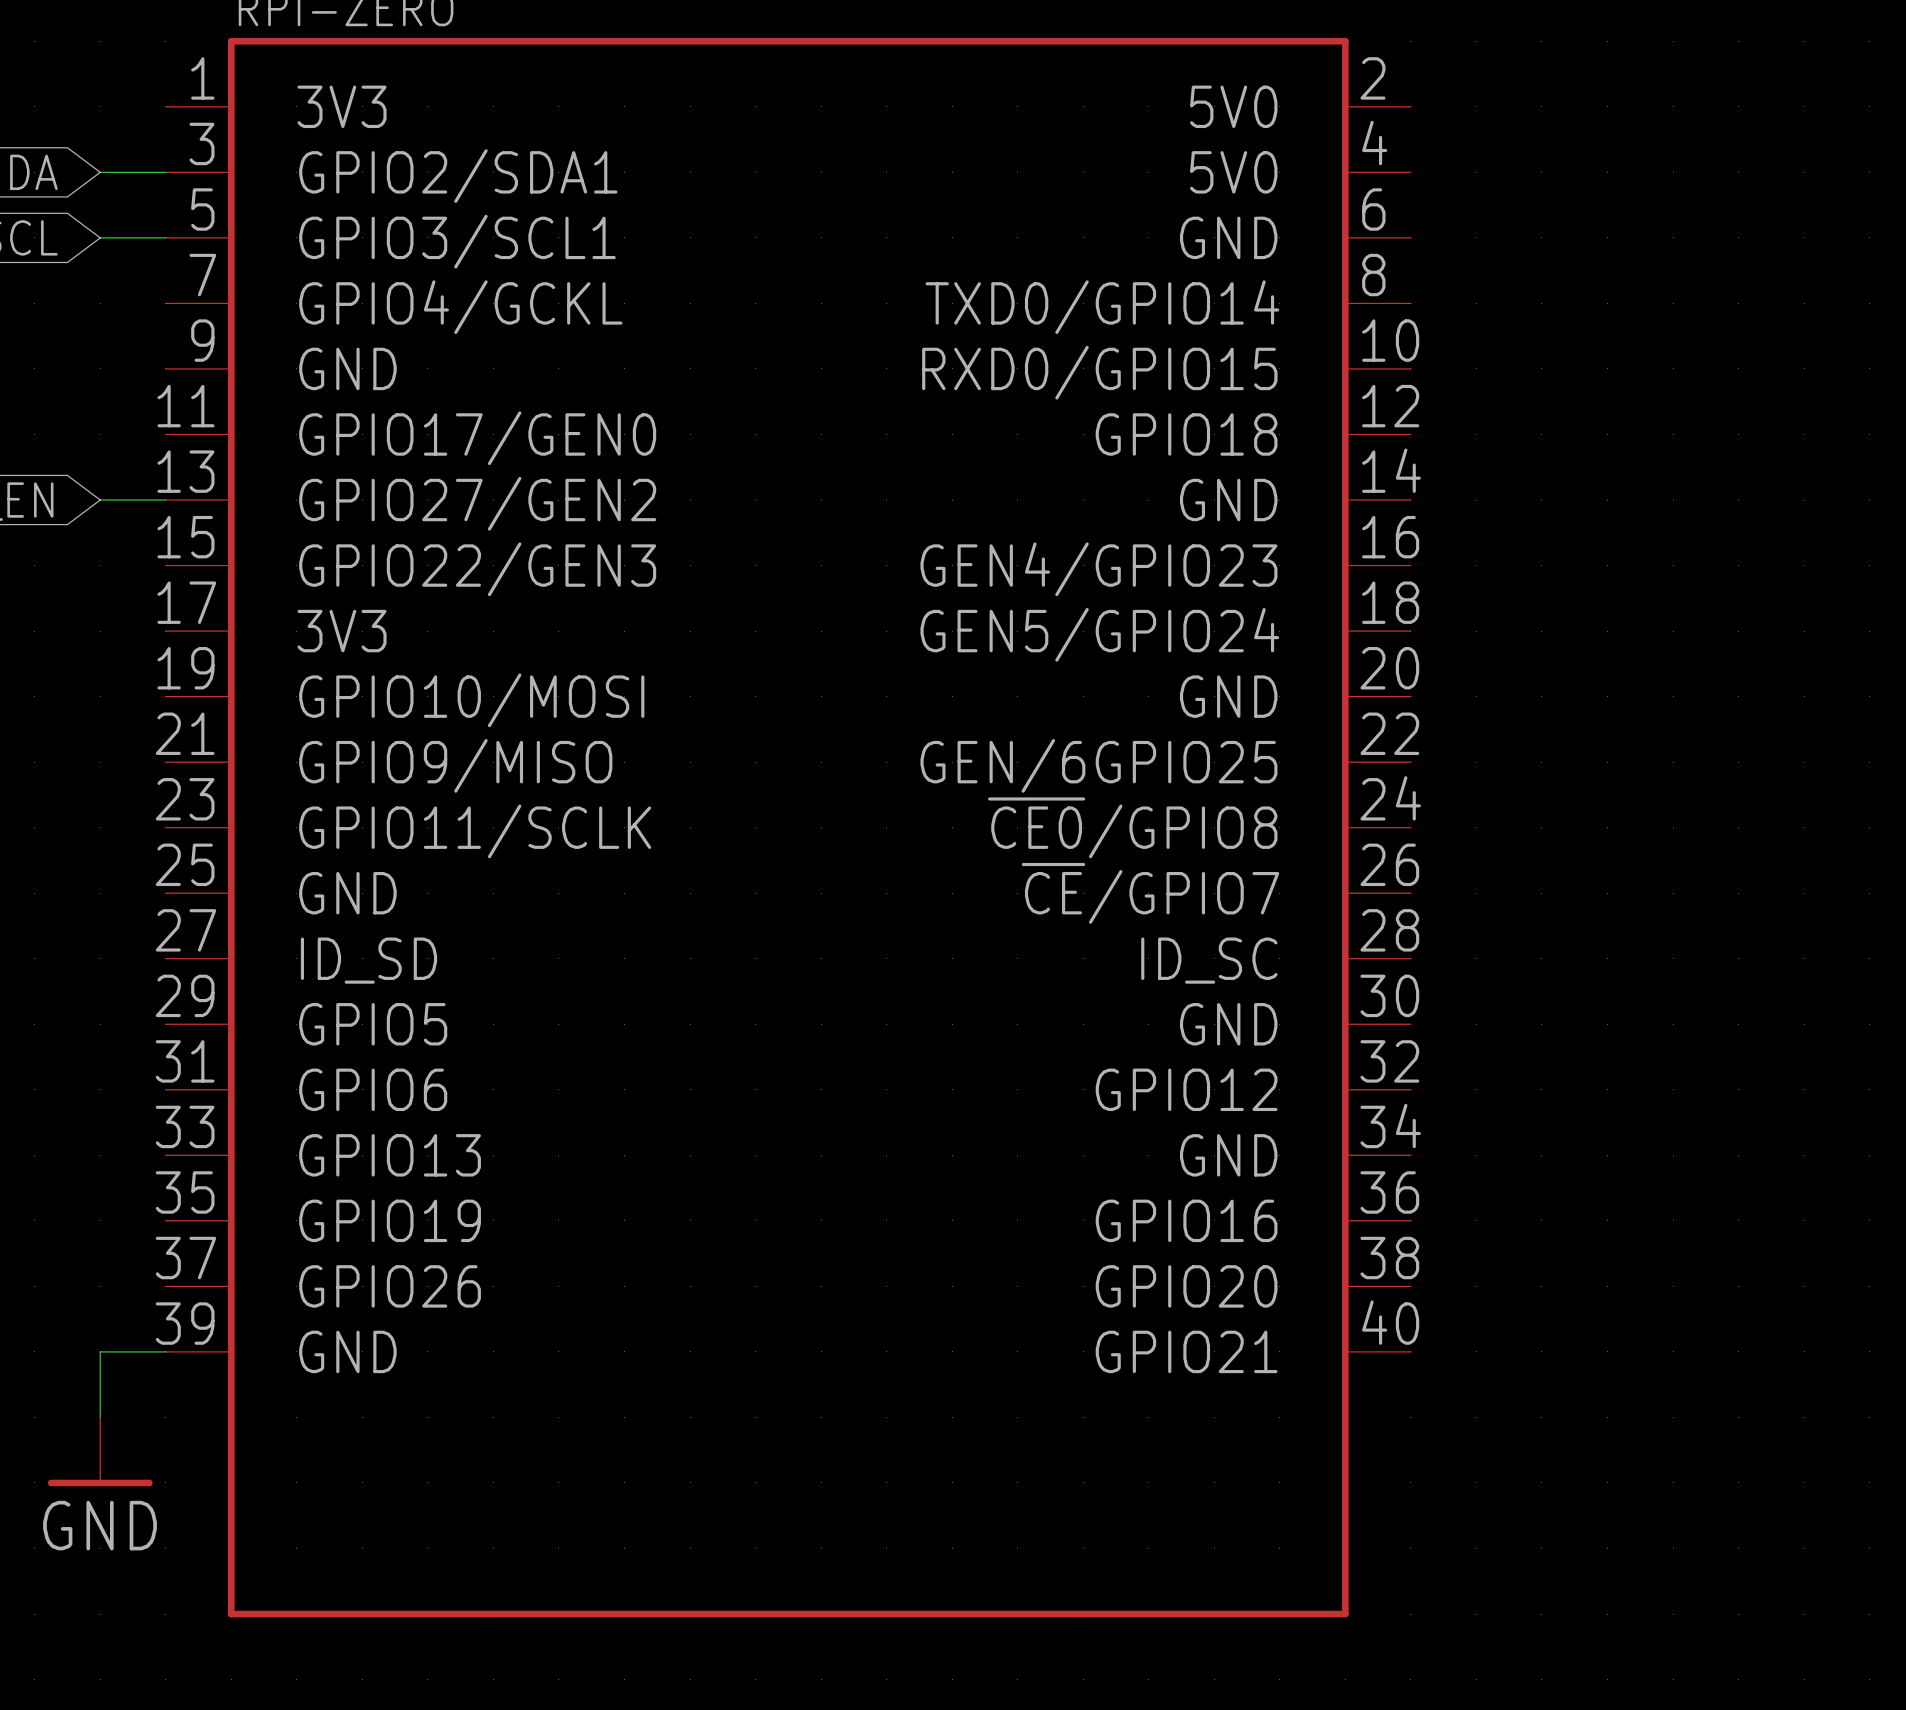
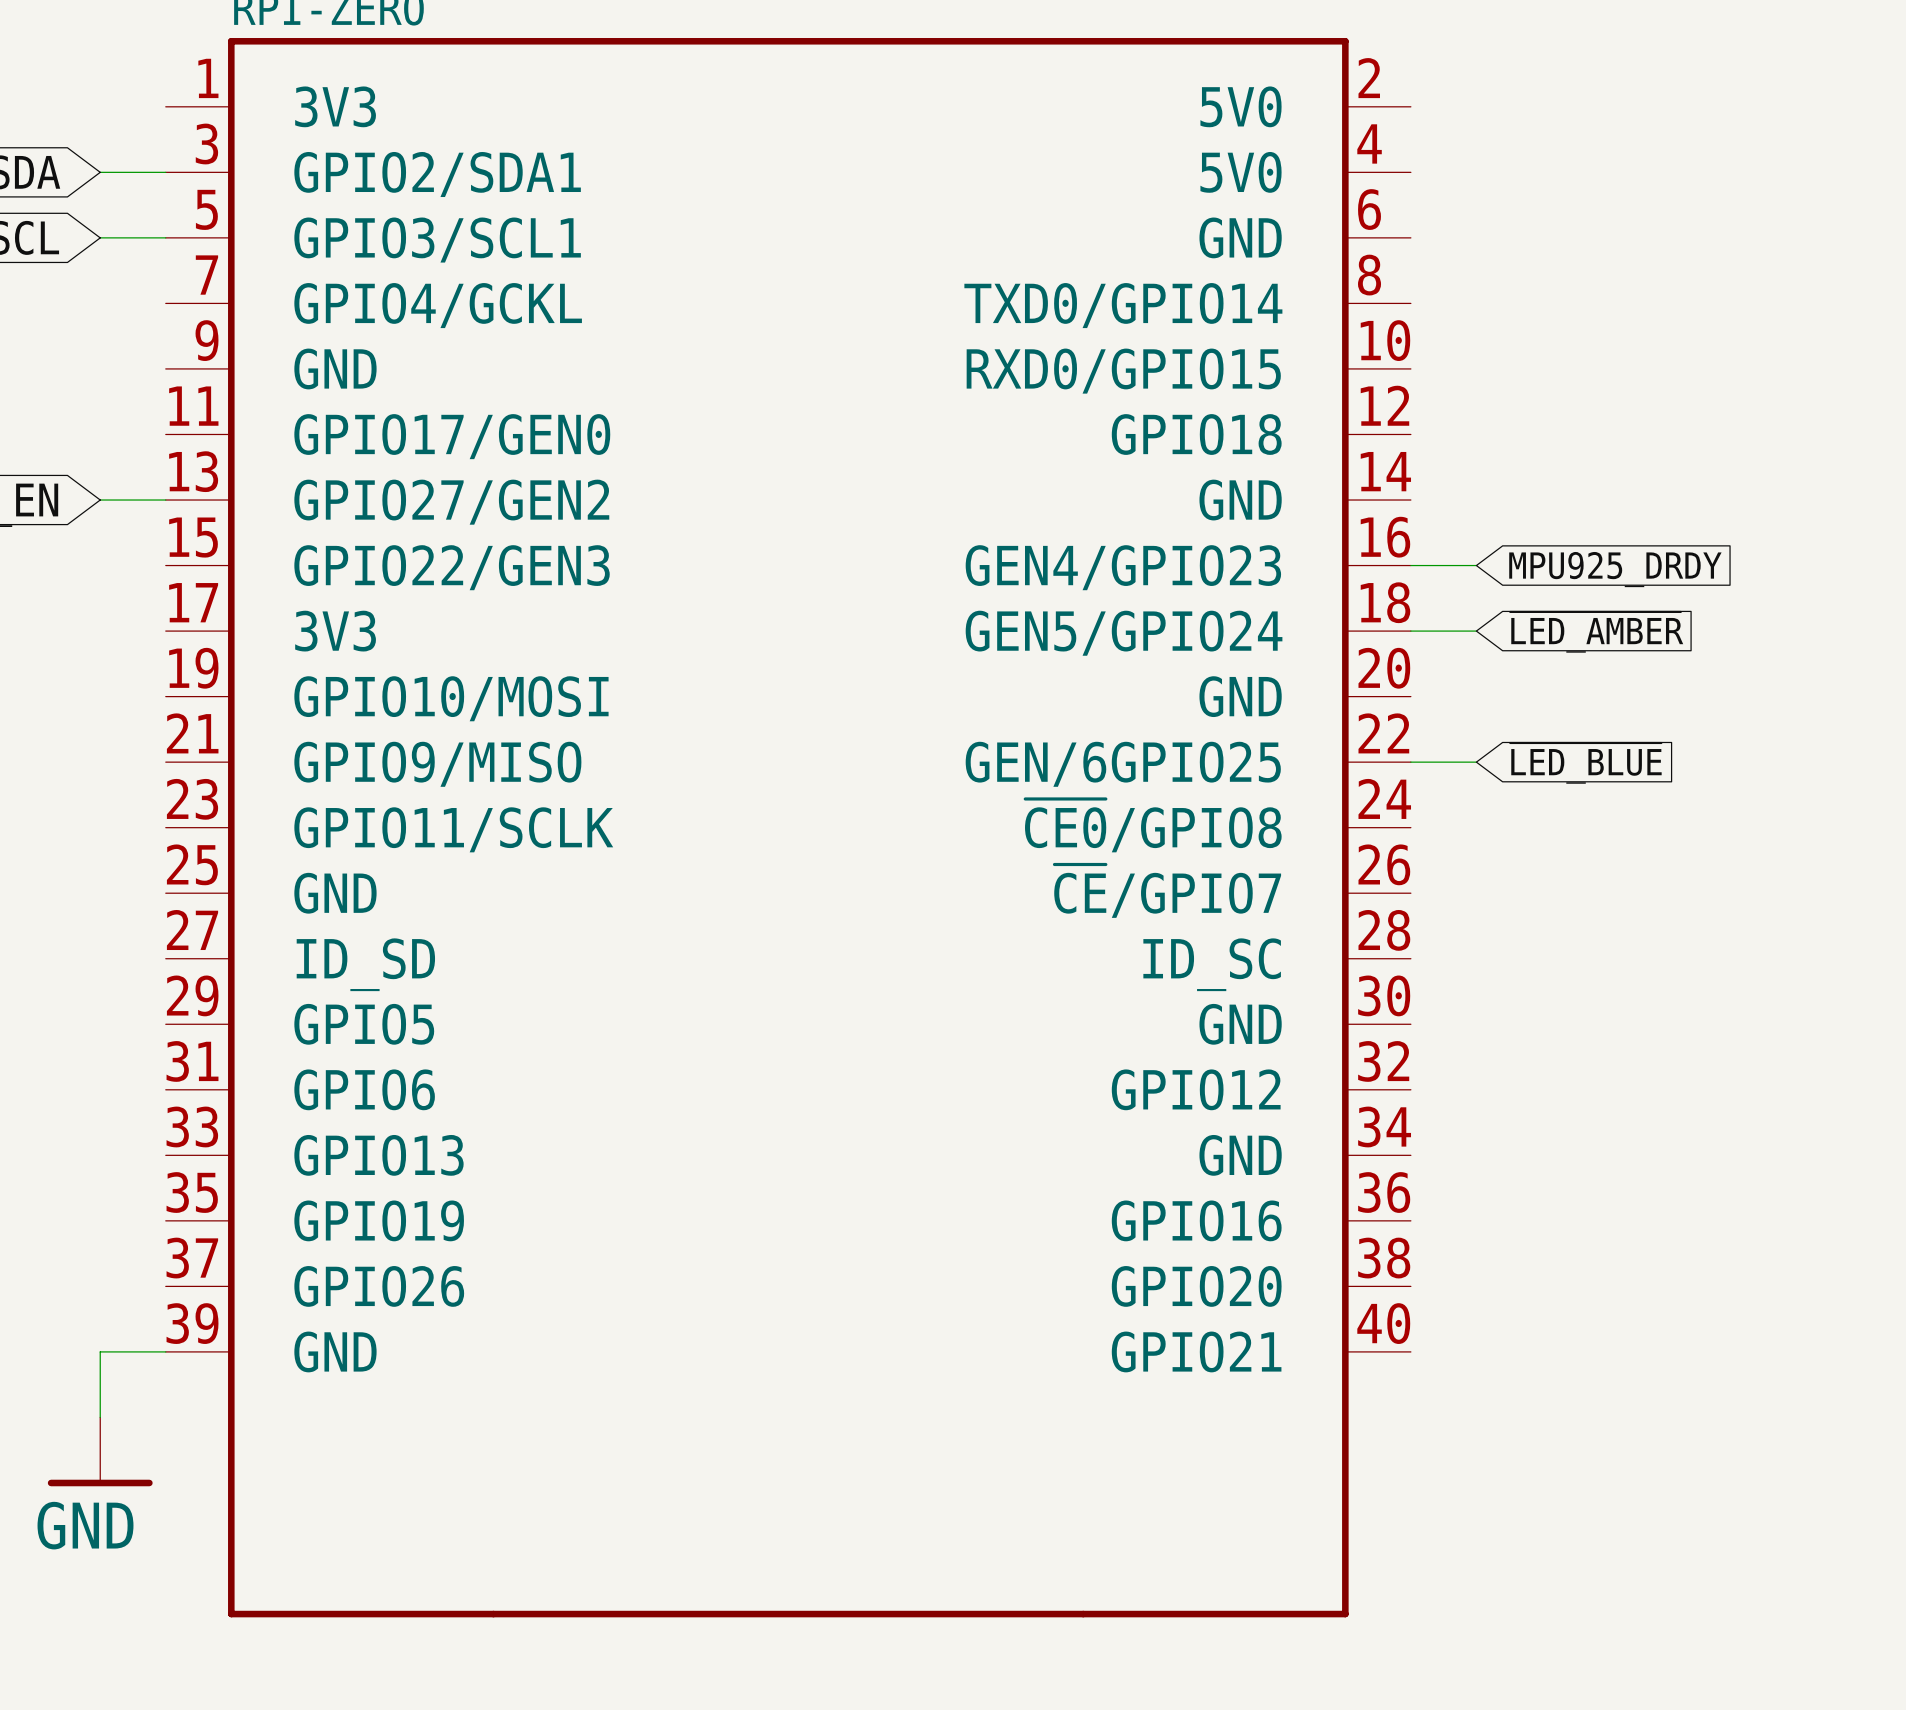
wire: none -> (1410, 565) (1476, 565)
global label: none -> MPU925_DRDY (1615, 569)
global label: none -> ~{LED_AMBER} (1596, 632)
wire: none -> (1410, 631) (1476, 631)
global label: none -> ~{LED_BLUE} (1585, 763)
wire: none -> (1410, 762) (1476, 762)

